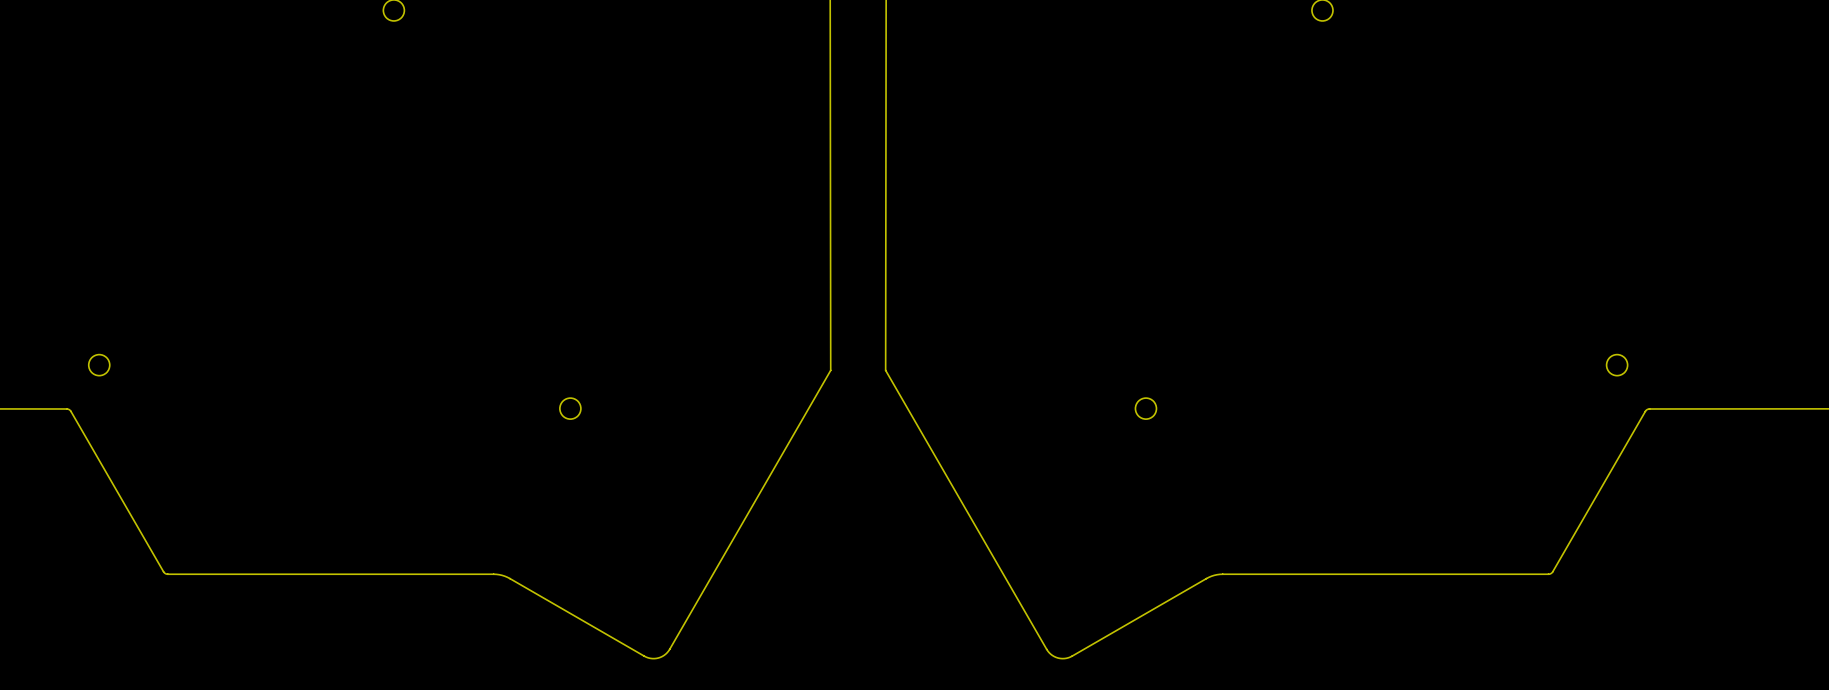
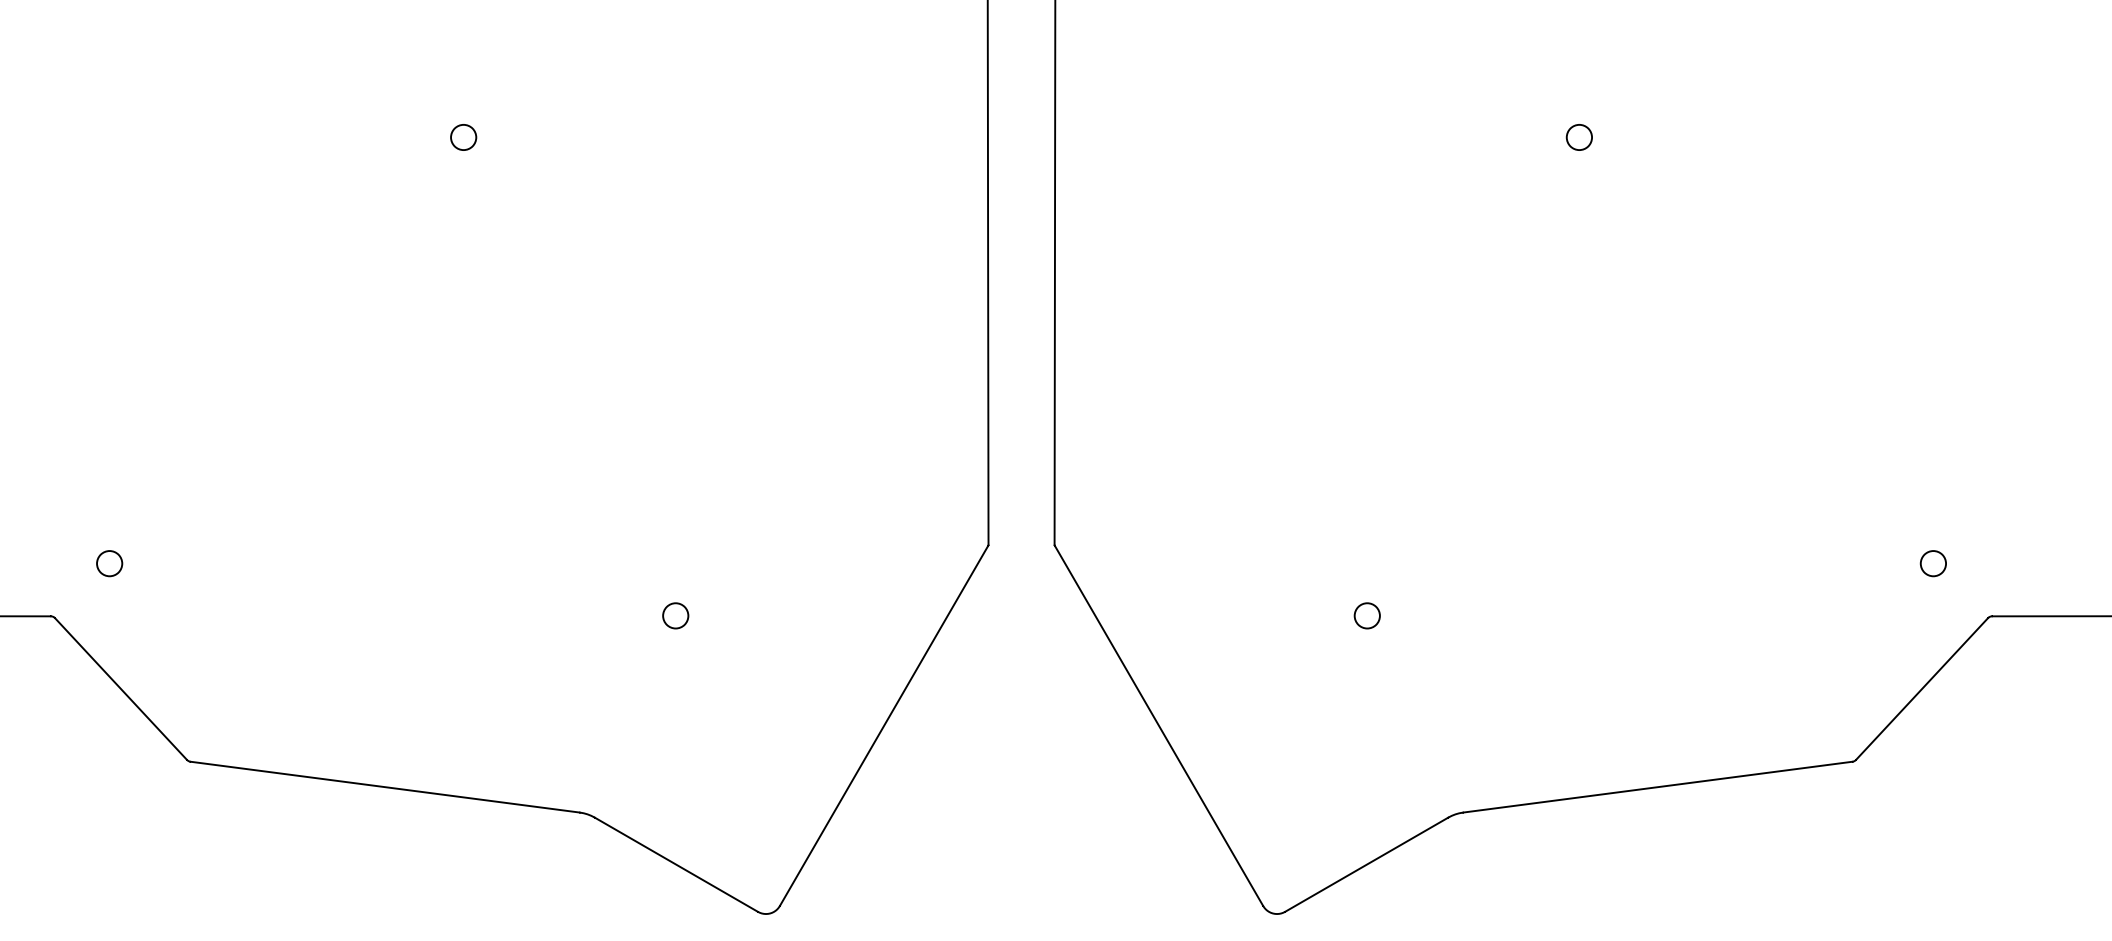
board edge: (830, 349) (830, 370) (669, 649) (662, 656) (654, 658) (644, 656) (509, 578) (499, 574) (165, 573) (70, 410) (67, 409) (50, 408) -> (988, 545) (779, 906) (774, 911) (768, 913) (758, 911) (594, 817) (583, 813) (189, 761) (54, 617) (50, 616)
board edge: (885, 349) (885, 370) (1046, 649) (1052, 655) (1062, 658) (1072, 656) (1206, 578) (1217, 574) (1550, 573) (1645, 410) (1648, 409) (1666, 408) -> (1054, 545) (1263, 906) (1267, 910) (1274, 913) (1285, 911) (1448, 817) (1459, 813) (1853, 761) (1988, 617) (1992, 616)

